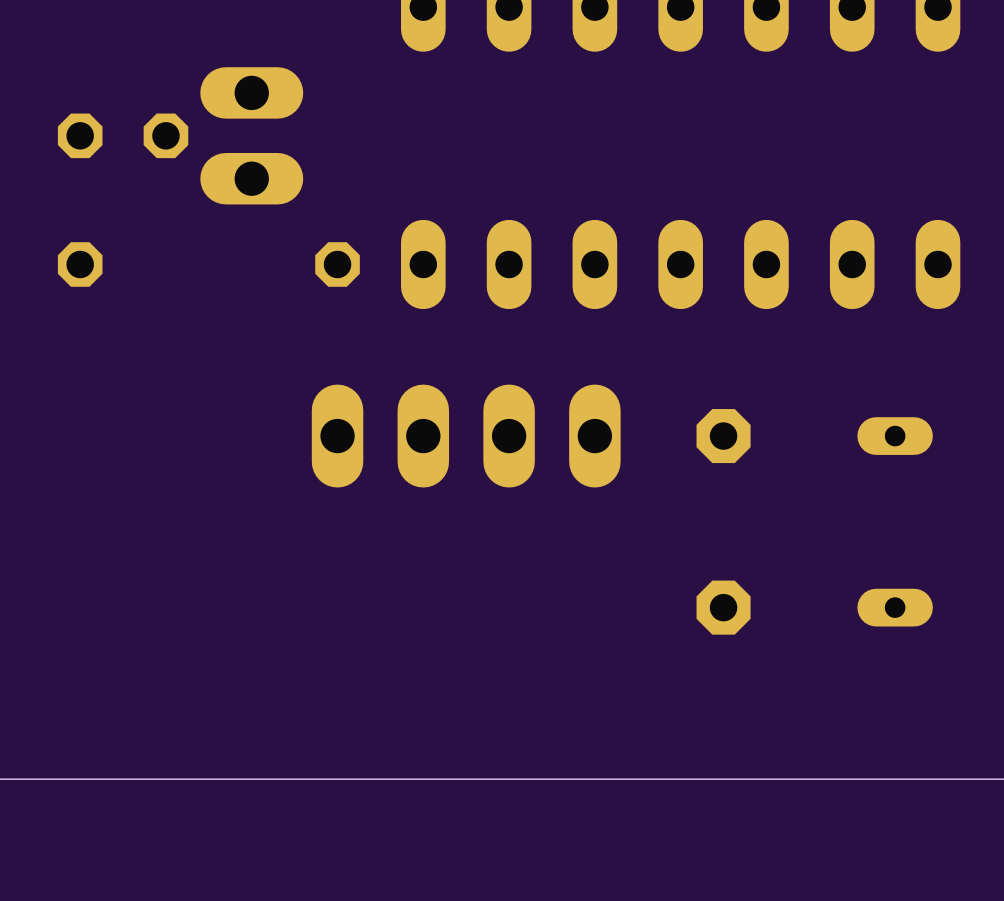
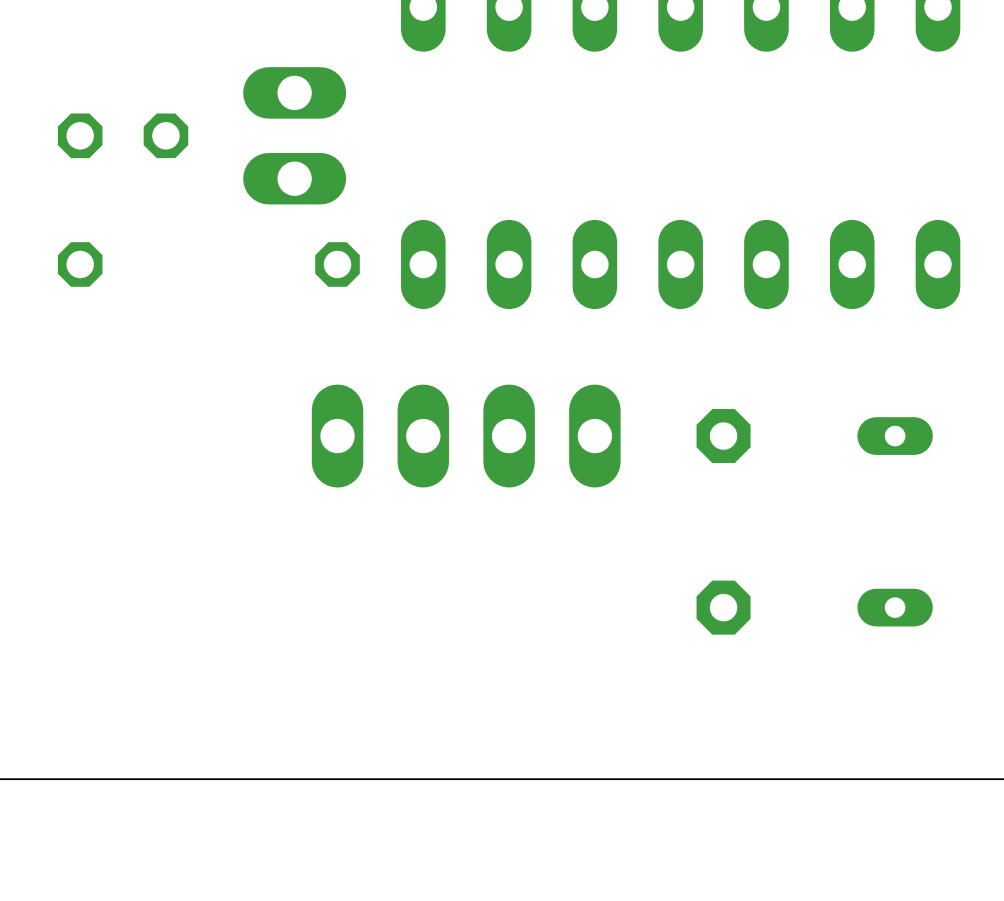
part position: (251, 135) -> (294, 135)

